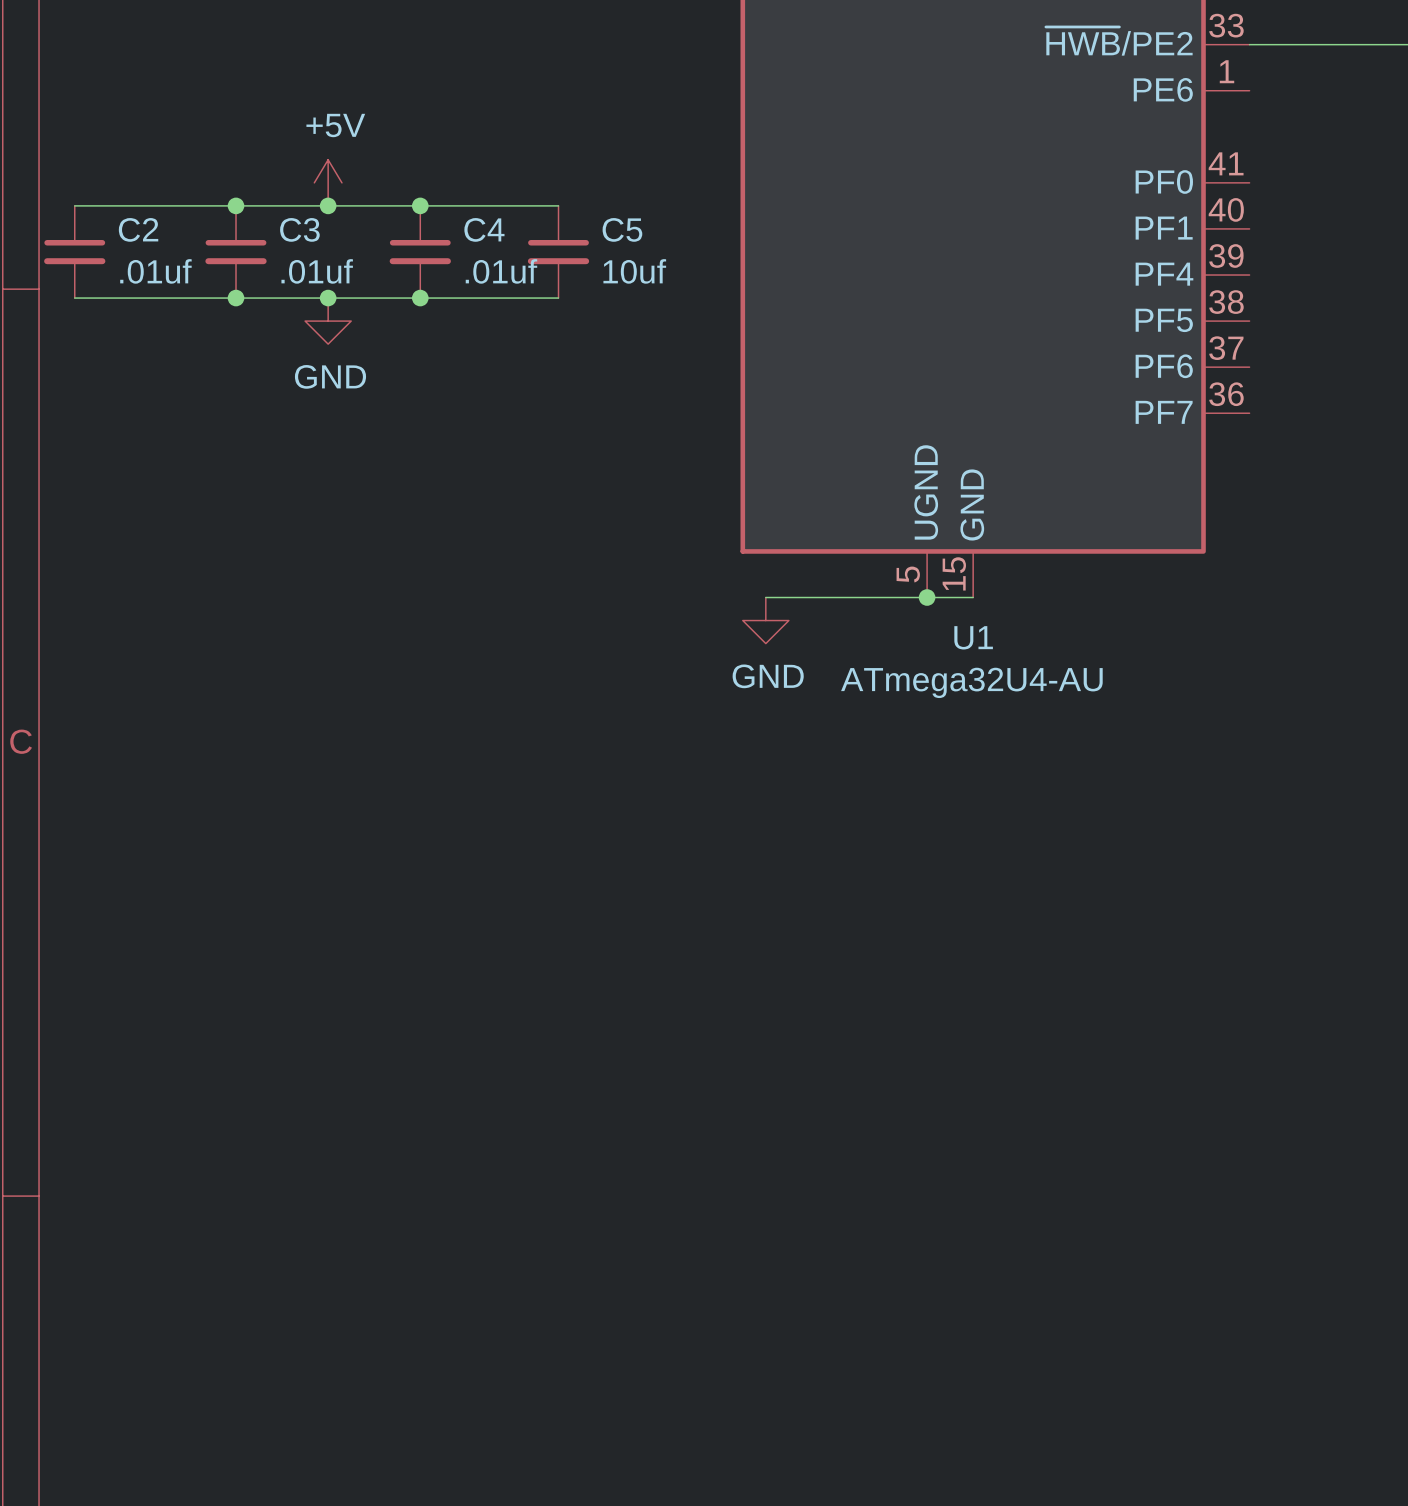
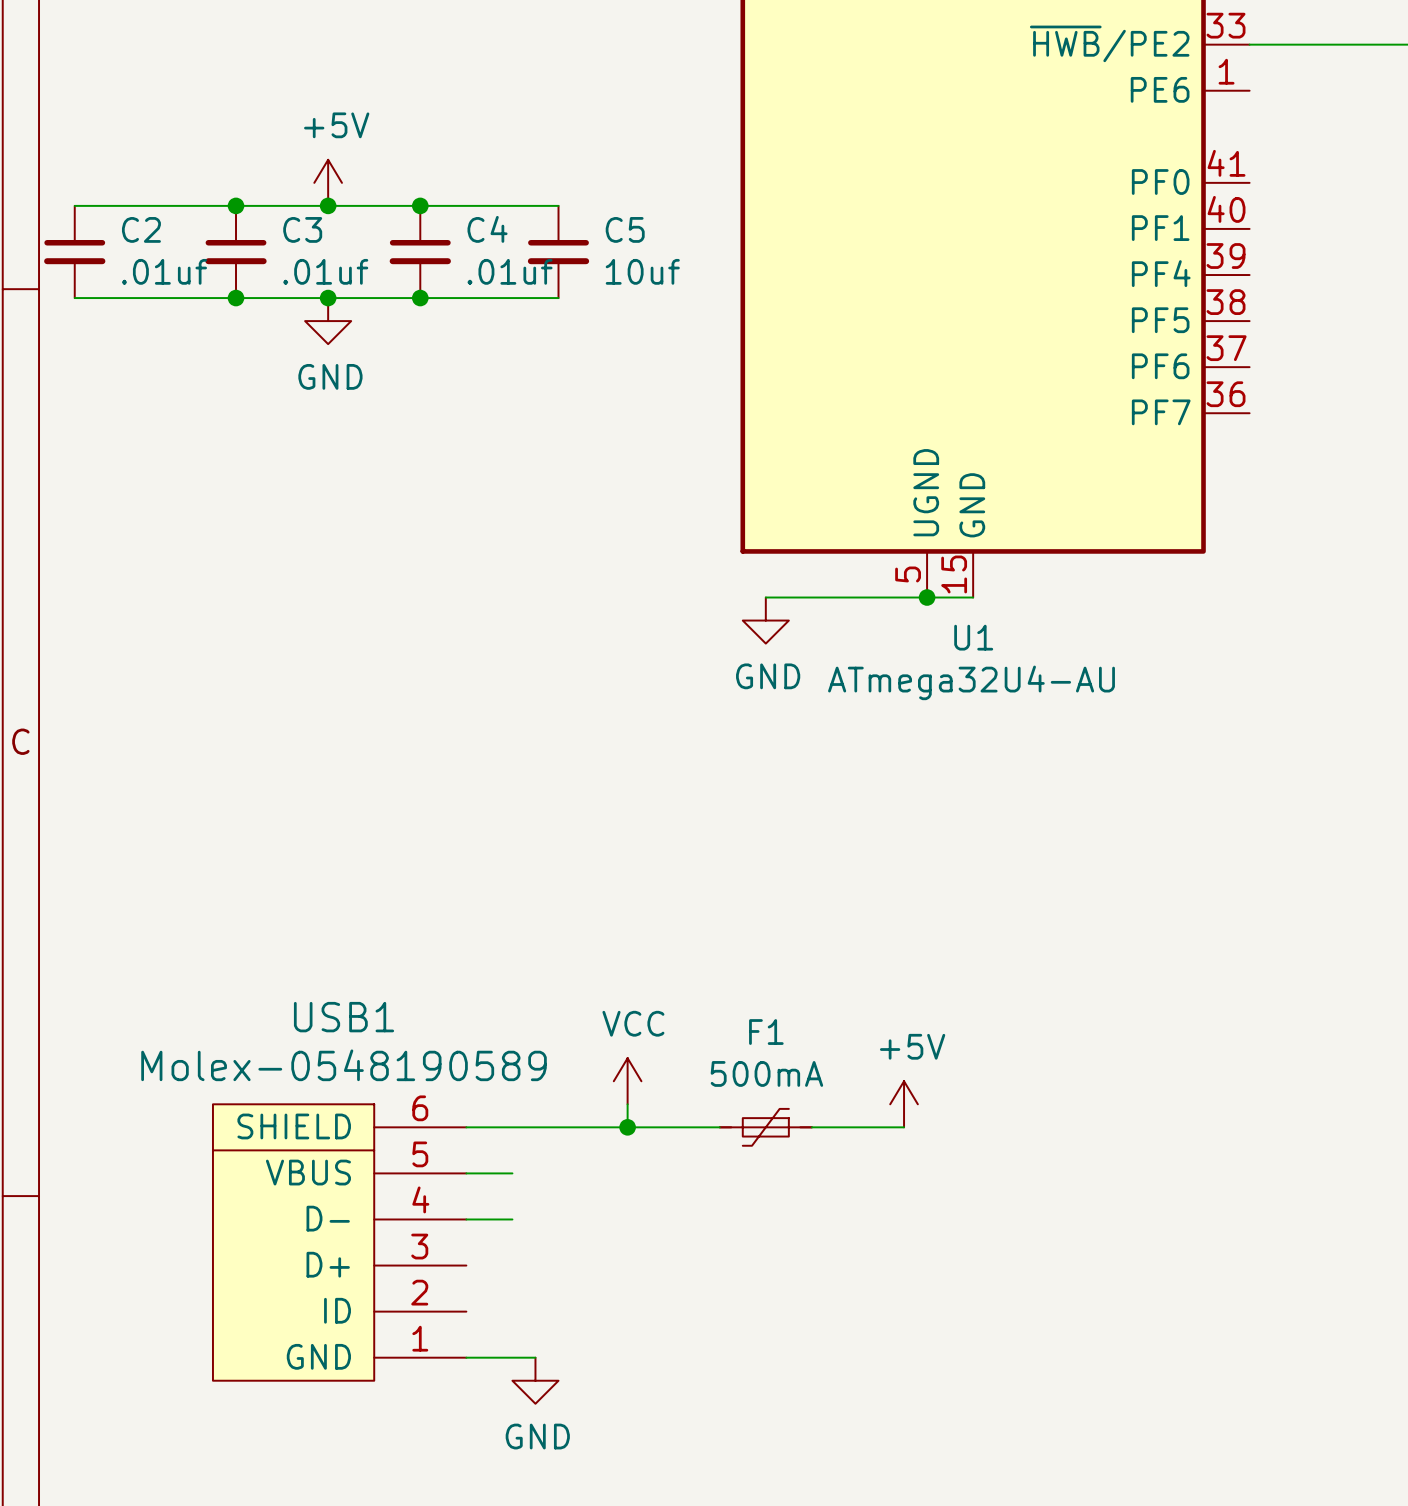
power symbol: none -> VCC (627, 1081)
wire: none -> (627, 1104) (627, 1127)
power symbol: none -> +5V (904, 1104)
wire: none -> (466, 1127) (719, 1127)
junction: none -> (627, 1127)
F1: none -> 500mA (765, 1127)
wire: none -> (811, 1127) (904, 1127)
wire: none -> (466, 1173) (512, 1173)
wire: none -> (466, 1219) (512, 1219)
USB1: none -> Molex-0548190589 (339, 1242)
wire: none -> (466, 1357) (535, 1357)
power symbol: none -> GND (535, 1380)

